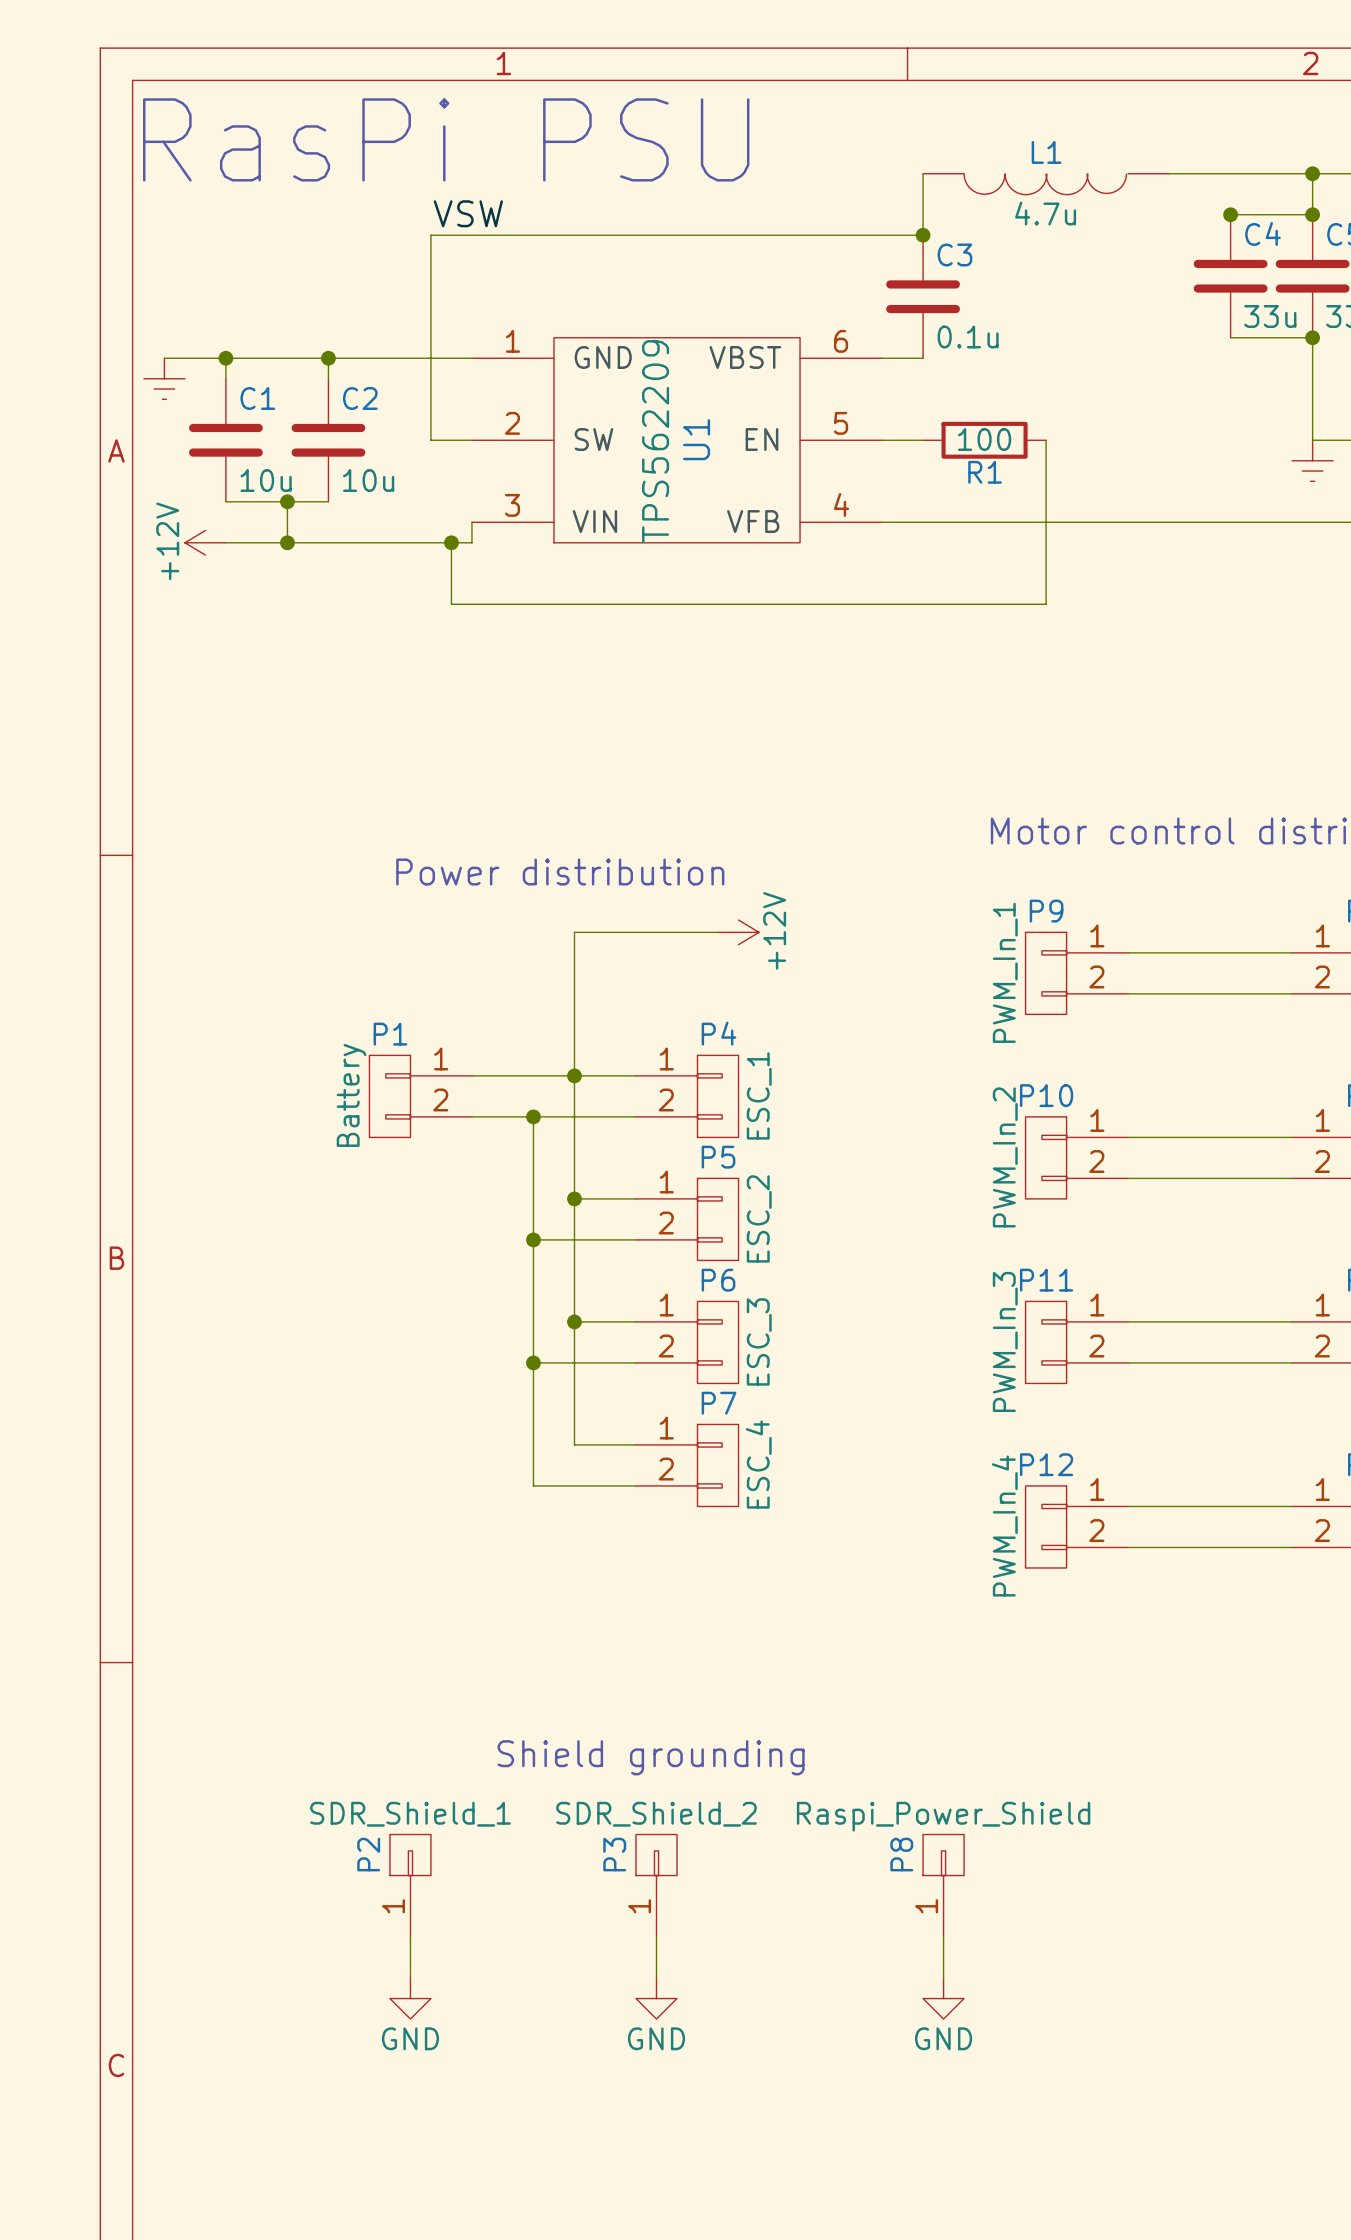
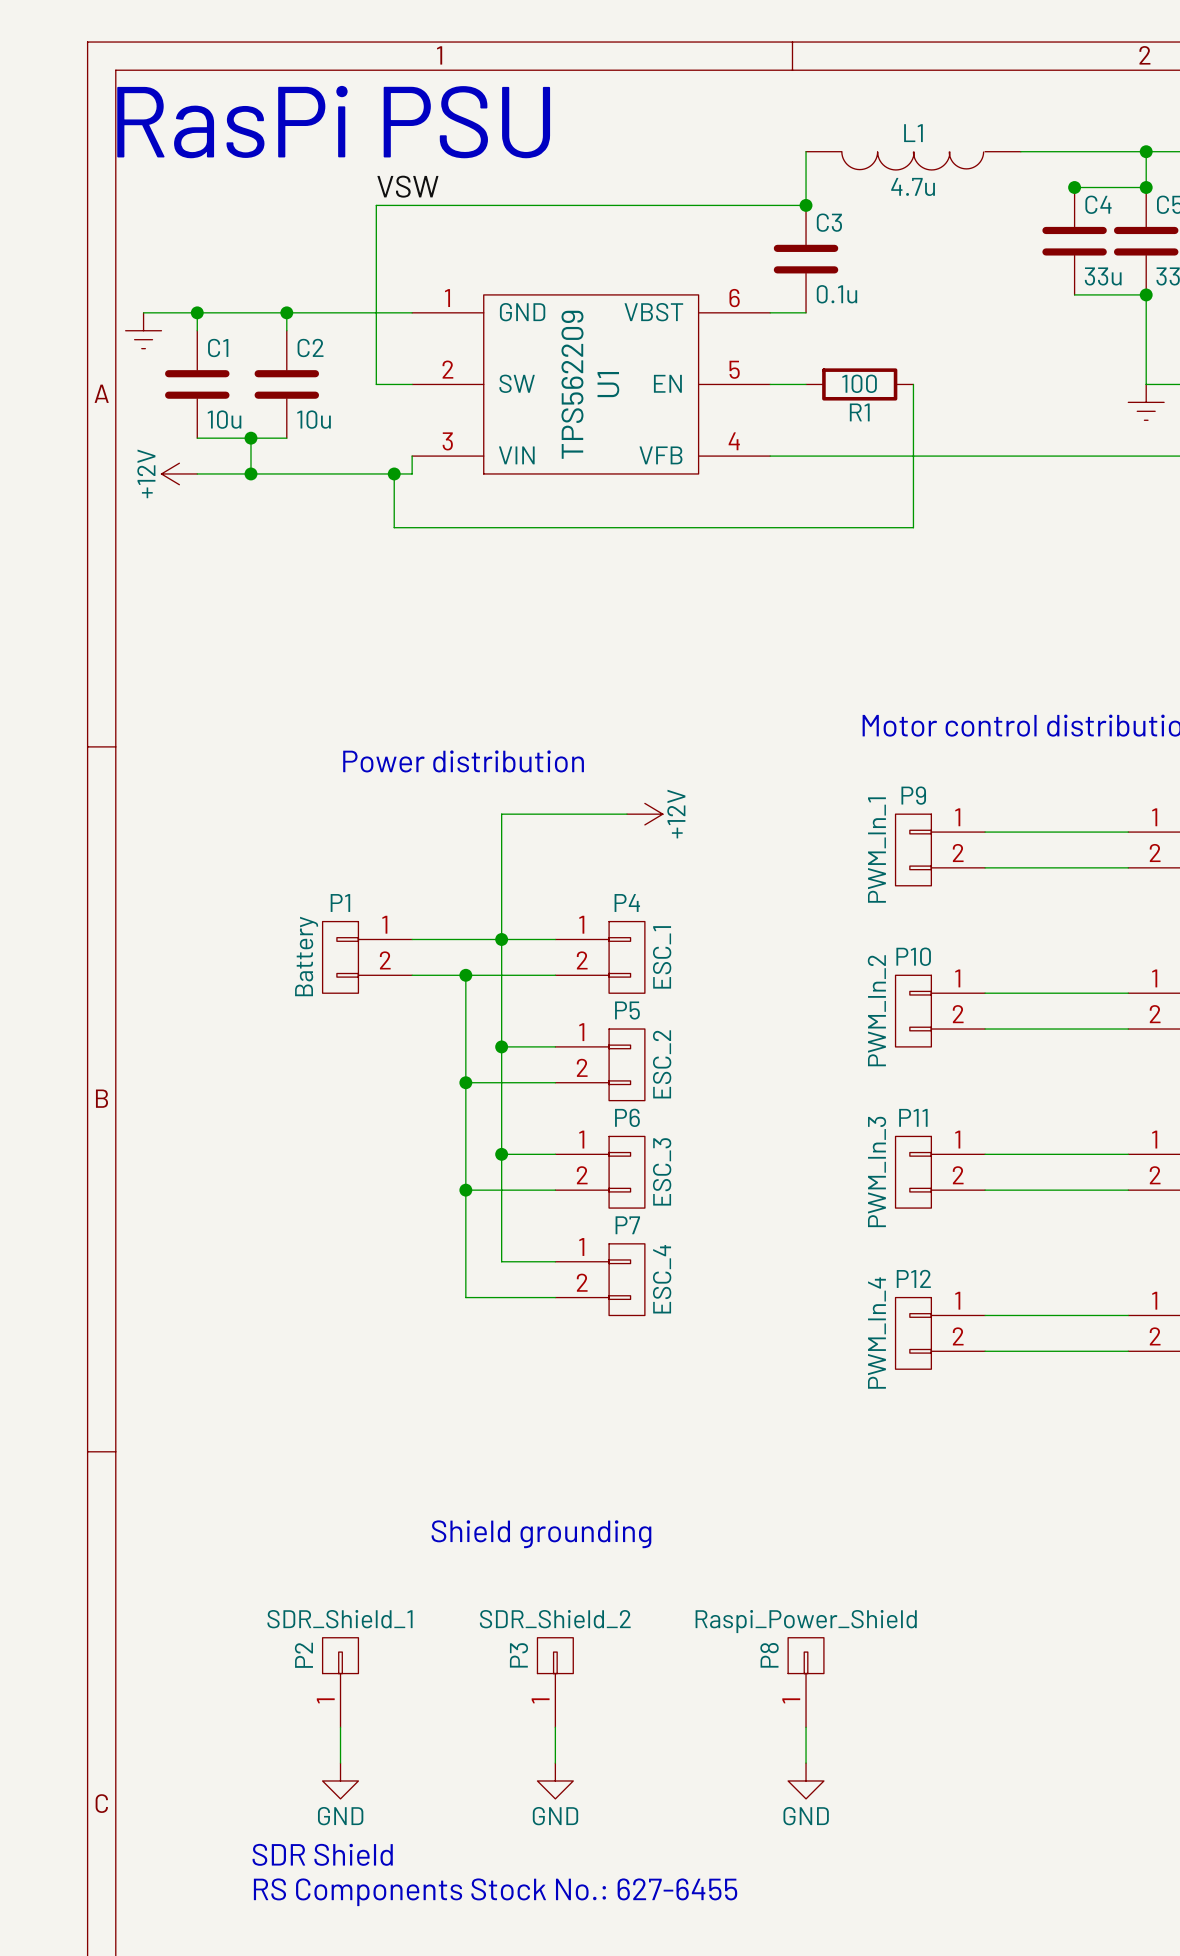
P2 position: (410, 1885) -> (340, 1682)
P3 position: (656, 1885) -> (555, 1682)
P8 position: (943, 1885) -> (806, 1682)
wire: (410, 1937) (410, 1978) -> (340, 1727) (340, 1763)
wire: (656, 1937) (656, 1978) -> (555, 1727) (555, 1763)
wire: (943, 1937) (943, 1978) -> (806, 1727) (806, 1763)
power symbol position: GND (410, 1998) -> GND (340, 1780)
power symbol position: GND (656, 1998) -> GND (555, 1780)
power symbol position: GND (943, 1998) -> GND (806, 1780)
text: none -> SDR Shield (322, 1854)
text: none -> RS Components Stock No.: 627-6455 (495, 1892)

